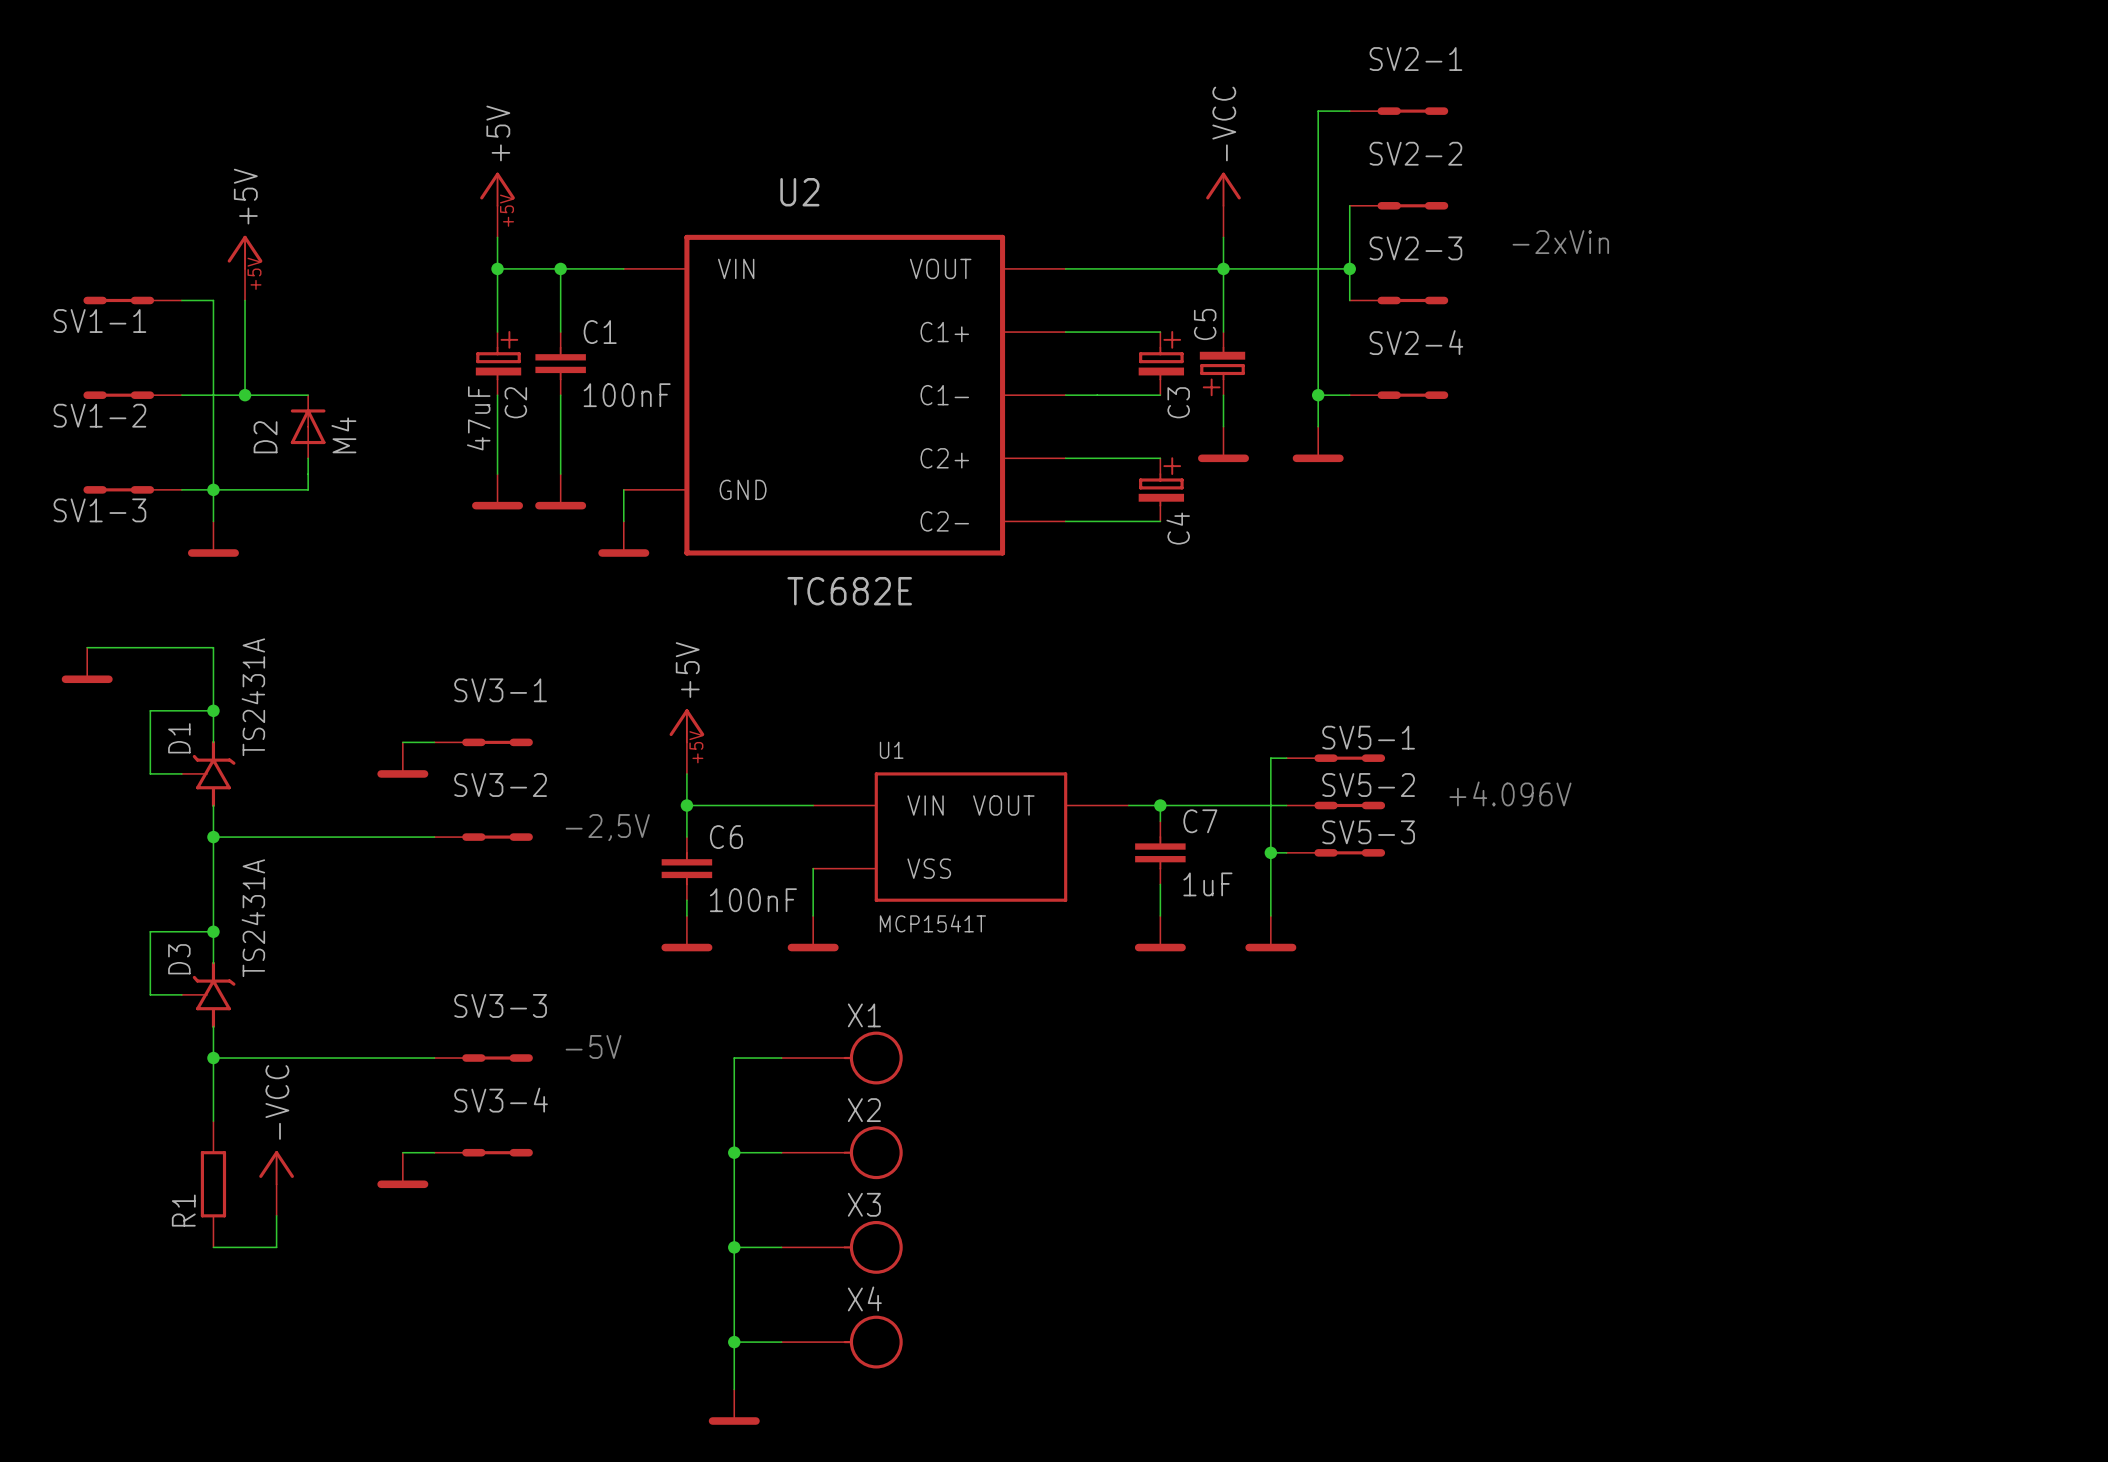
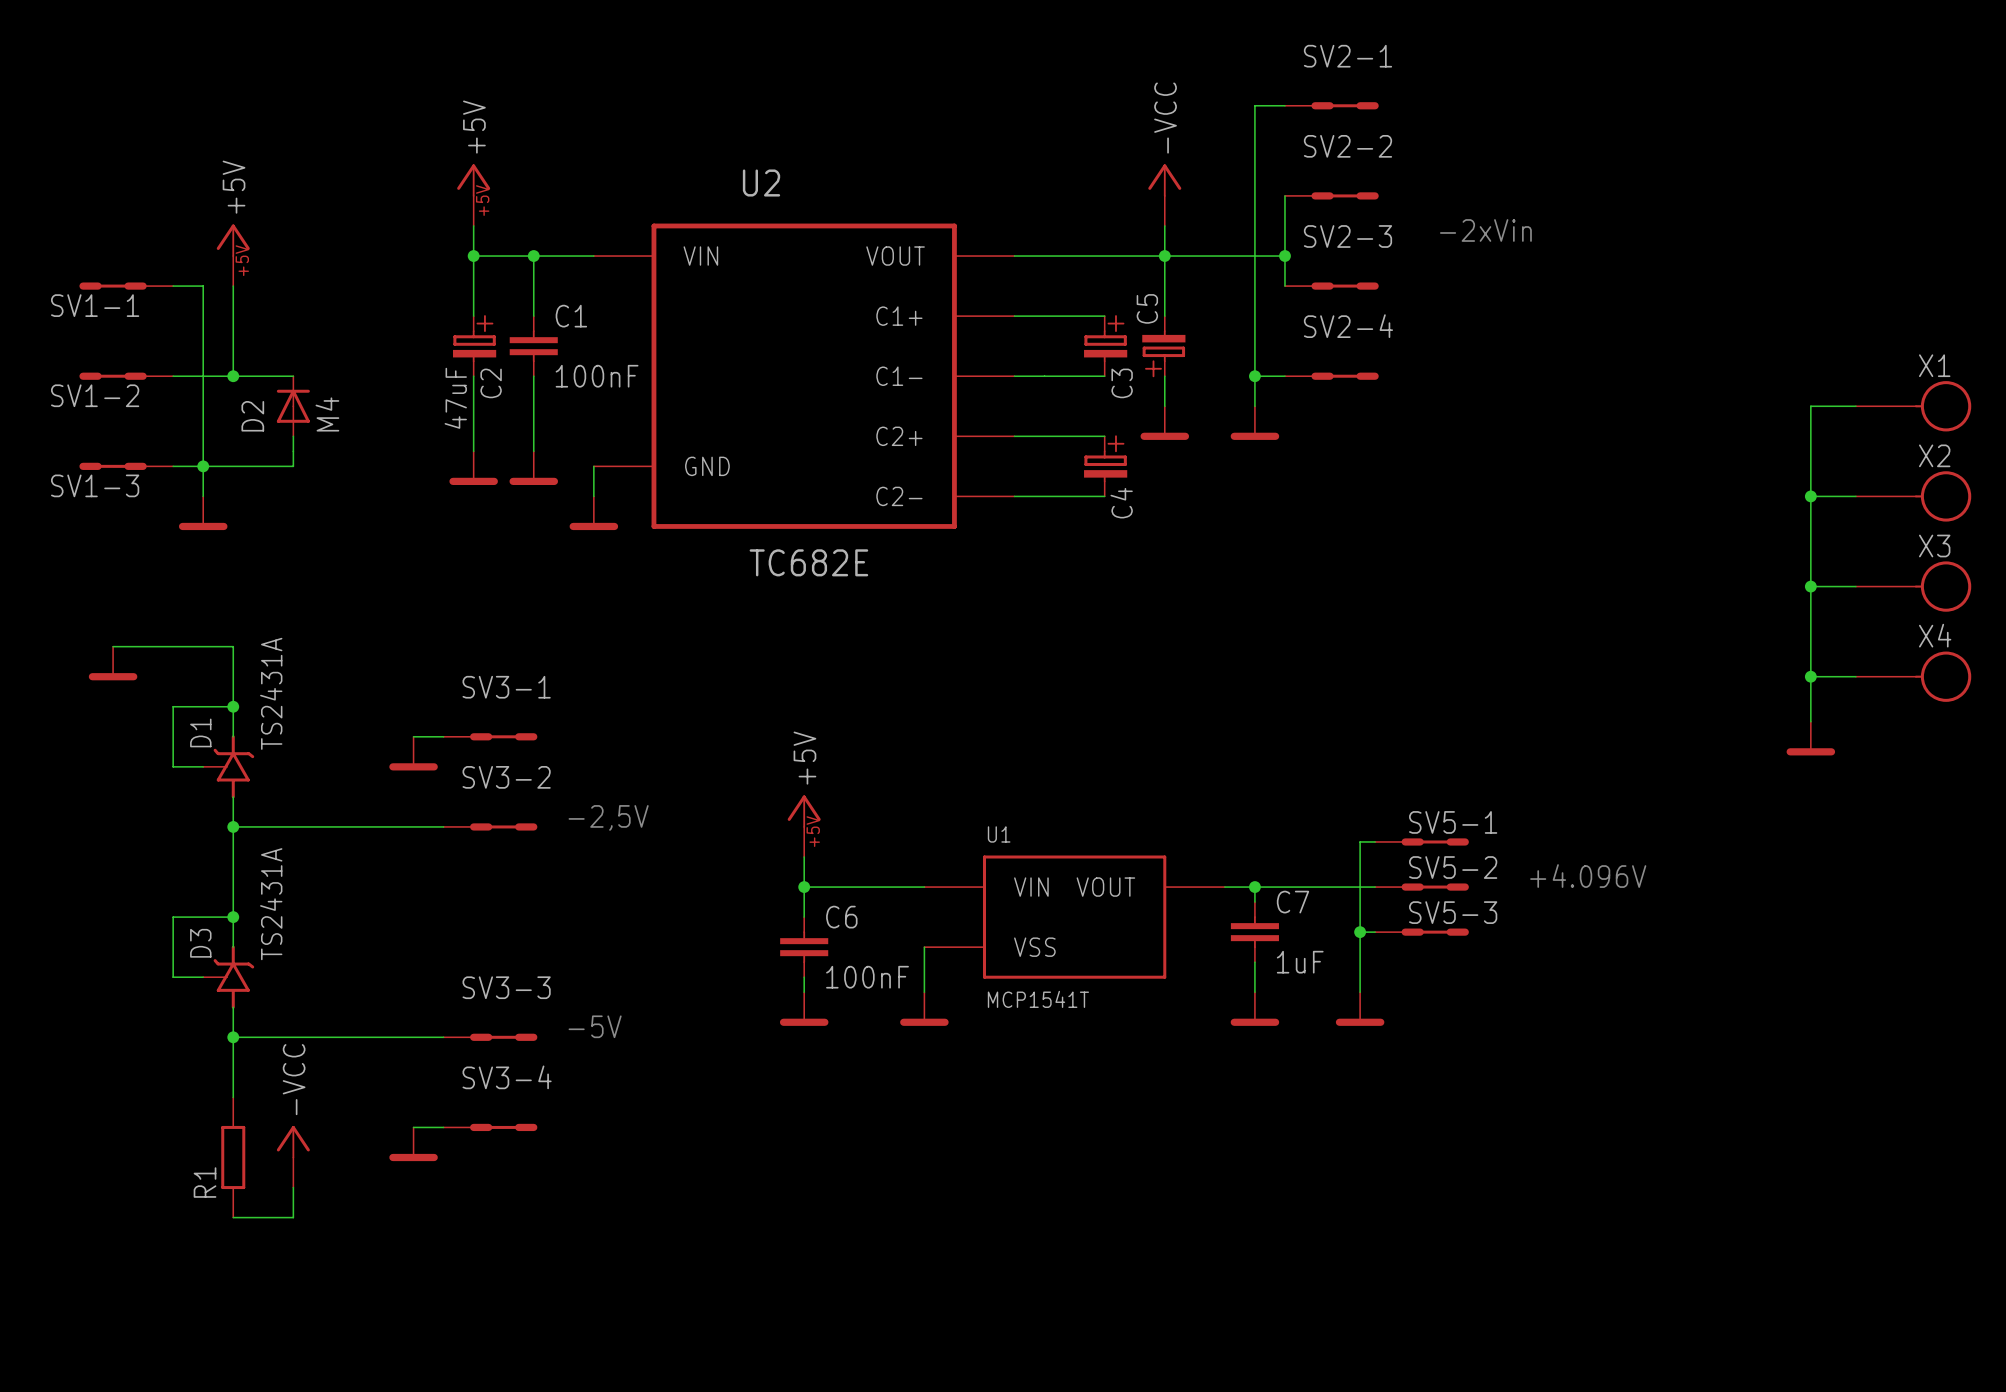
wire: none -> (1855, 406) (1810, 406) (1810, 721)
wire: none -> (1810, 496) (1855, 496)
junction: none -> (1810, 496)
wire: none -> (1810, 586) (1855, 586)
junction: none -> (1810, 586)
wire: (87, 647) (213, 647) (213, 742) -> (113, 646) (233, 646) (233, 736)
power symbol position: (87, 665) -> (113, 663)
wire: (213, 710) (150, 710) (150, 773) (181, 773) -> none
junction position: (213, 710) -> (233, 706)
wire: none -> (1810, 676) (1855, 676)
junction: none -> (1810, 676)
power symbol position: +5V (686, 741) -> +5V (804, 826)
wire: (402, 742) (434, 742) -> (413, 736) (443, 736)
SV3-1 position: (483, 742) -> (490, 736)
wire: (1286, 758) (1270, 758) (1270, 915) -> (1375, 841) (1360, 841) (1360, 992)
SV5-1 position: (1335, 758) -> (1422, 841)
power symbol position: (402, 760) -> (413, 753)
D1 position: (208, 773) -> (228, 766)
wire: (686, 773) (686, 837) -> (804, 857) (804, 917)
power symbol: none -> (1810, 738)
text position: +4.096V (1510, 793) -> +4.096V (1588, 876)
wire: (213, 805) (213, 963) -> (203, 766) (173, 766) (173, 706) (233, 706)
wire: (686, 805) (813, 805) -> (804, 887) (924, 887)
junction: (686, 805) -> none
wire: (1128, 805) (1286, 805) -> (1224, 887) (1375, 887)
wire: (1160, 805) (1160, 821) -> (1254, 887) (1254, 902)
junction: (1160, 805) -> none
SV5-2 position: (1335, 805) -> (1422, 887)
text position: -2,5V (607, 827) -> -2,5V (608, 817)
wire: (213, 837) (434, 837) -> (233, 826) (443, 826)
junction: (213, 837) -> none
wire: none -> (233, 796) (233, 947)
SV3-2 position: (483, 837) -> (490, 826)
U1 position: (970, 837) -> (1074, 917)
C7 position: (1160, 852) -> (1254, 932)
wire: (1270, 852) (1286, 852) -> (1360, 932) (1375, 932)
junction: (1270, 852) -> none
SV5-3 position: (1335, 852) -> (1422, 932)
junction: none -> (233, 826)
C6 position: (686, 868) -> (804, 947)
wire: (813, 868) (813, 915) -> (924, 947) (924, 992)
wire: (1160, 884) (1160, 915) -> (1254, 962) (1254, 992)
wire: (686, 900) (686, 915) -> (804, 977) (804, 992)
wire: (213, 931) (150, 931) (150, 994) (181, 994) -> none
junction: (213, 931) -> none
junction: none -> (804, 887)
junction: none -> (1254, 887)
power symbol: (686, 933) -> none
power symbol: (813, 933) -> none
power symbol: (1160, 933) -> none
power symbol: (1270, 933) -> none
junction: none -> (233, 917)
junction: none -> (1360, 932)
D3 position: (208, 994) -> (228, 977)
wire: (213, 1026) (213, 1121) -> (203, 977) (173, 977) (173, 917) (233, 917)
text position: -5V (593, 1046) -> -5V (595, 1026)
wire: (213, 1058) (434, 1058) -> (233, 1037) (443, 1037)
junction position: (213, 1058) -> (233, 1037)
wire: none -> (233, 1007) (233, 1097)
SV3-3 position: (483, 1058) -> (490, 1037)
wire: (781, 1058) (734, 1058) (734, 1389) -> none
X1 position: (842, 1058) -> (1913, 406)
power symbol: none -> (804, 1009)
power symbol: none -> (924, 1009)
power symbol: none -> (1254, 1009)
power symbol: none -> (1360, 1009)
wire: (402, 1152) (434, 1152) -> (413, 1127) (443, 1127)
SV3-4 position: (483, 1152) -> (490, 1127)
wire: (734, 1152) (781, 1152) -> none
junction: (734, 1152) -> none
X2 position: (842, 1152) -> (1913, 496)
power symbol position: (402, 1170) -> (413, 1144)
power symbol position: -VCC (276, 1183) -> -VCC (293, 1156)
R1 position: (213, 1184) -> (233, 1157)
wire: (276, 1215) (276, 1247) (213, 1247) -> (293, 1187) (293, 1217) (233, 1217)
wire: (734, 1247) (781, 1247) -> none
junction: (734, 1247) -> none
X3 position: (842, 1247) -> (1913, 586)
wire: (734, 1342) (781, 1342) -> none
junction: (734, 1342) -> none
X4 position: (842, 1342) -> (1913, 676)
power symbol: (734, 1407) -> none

